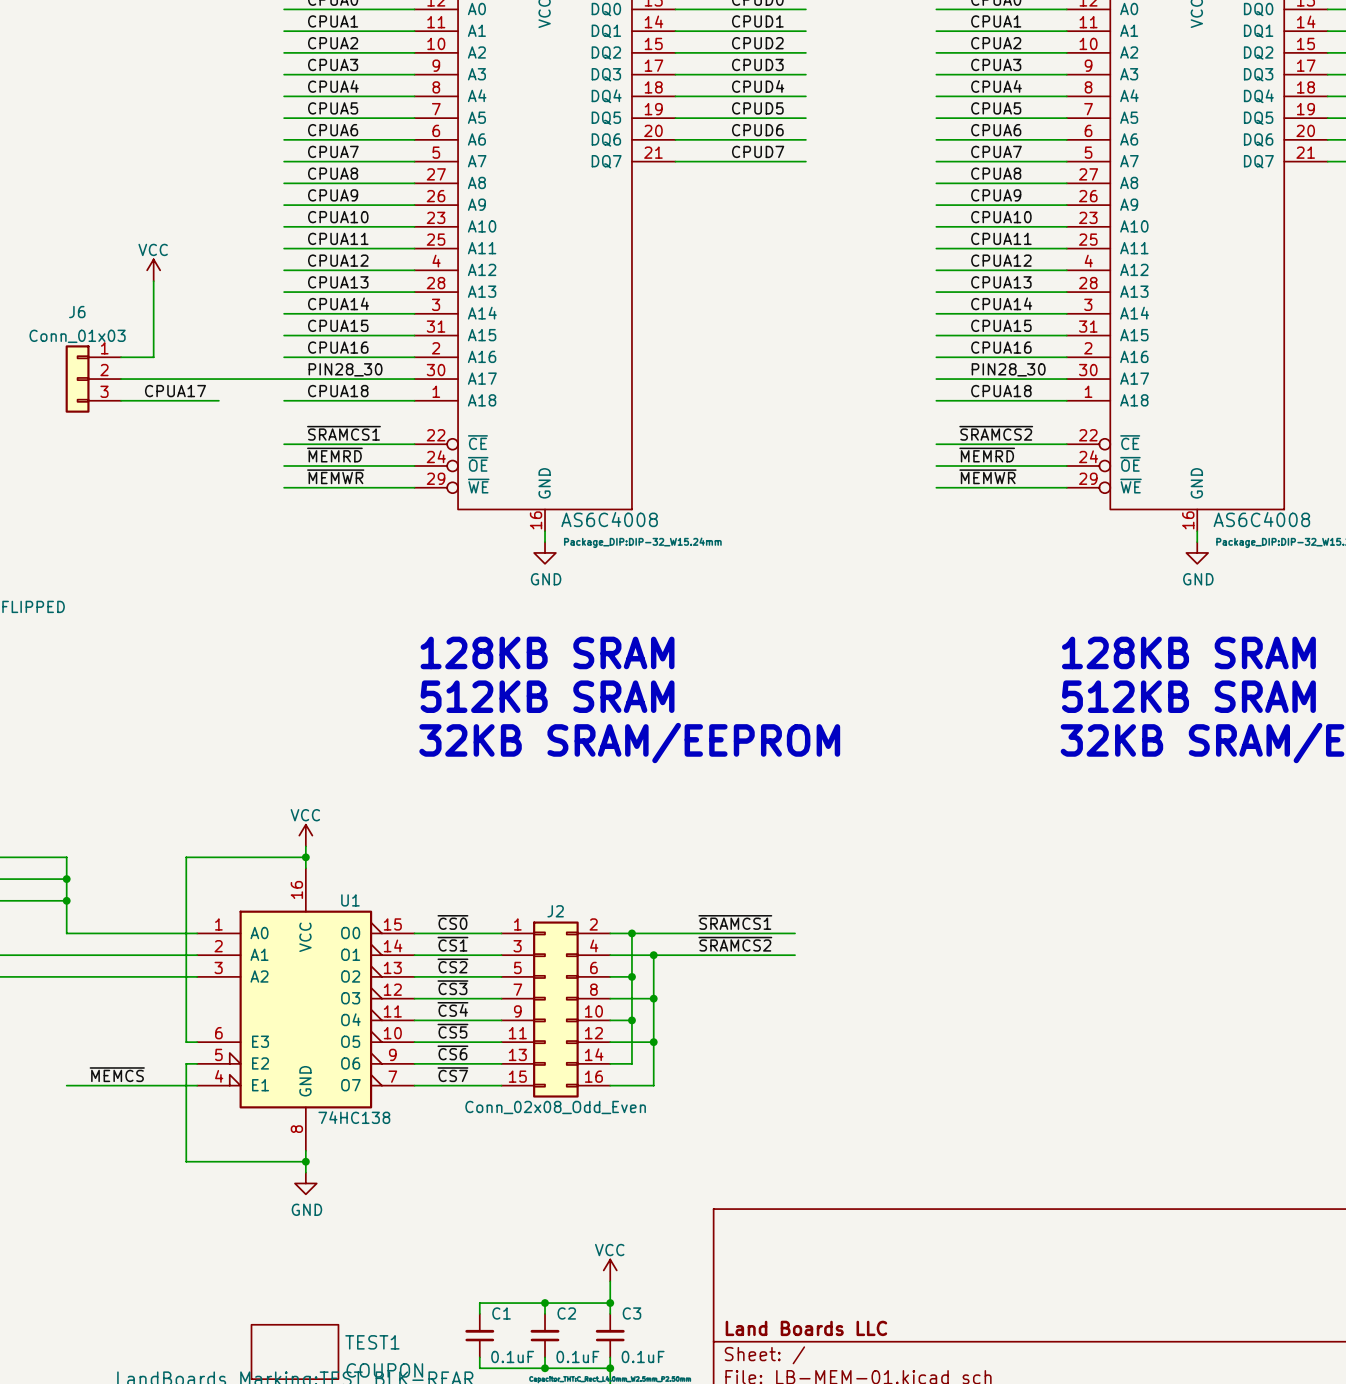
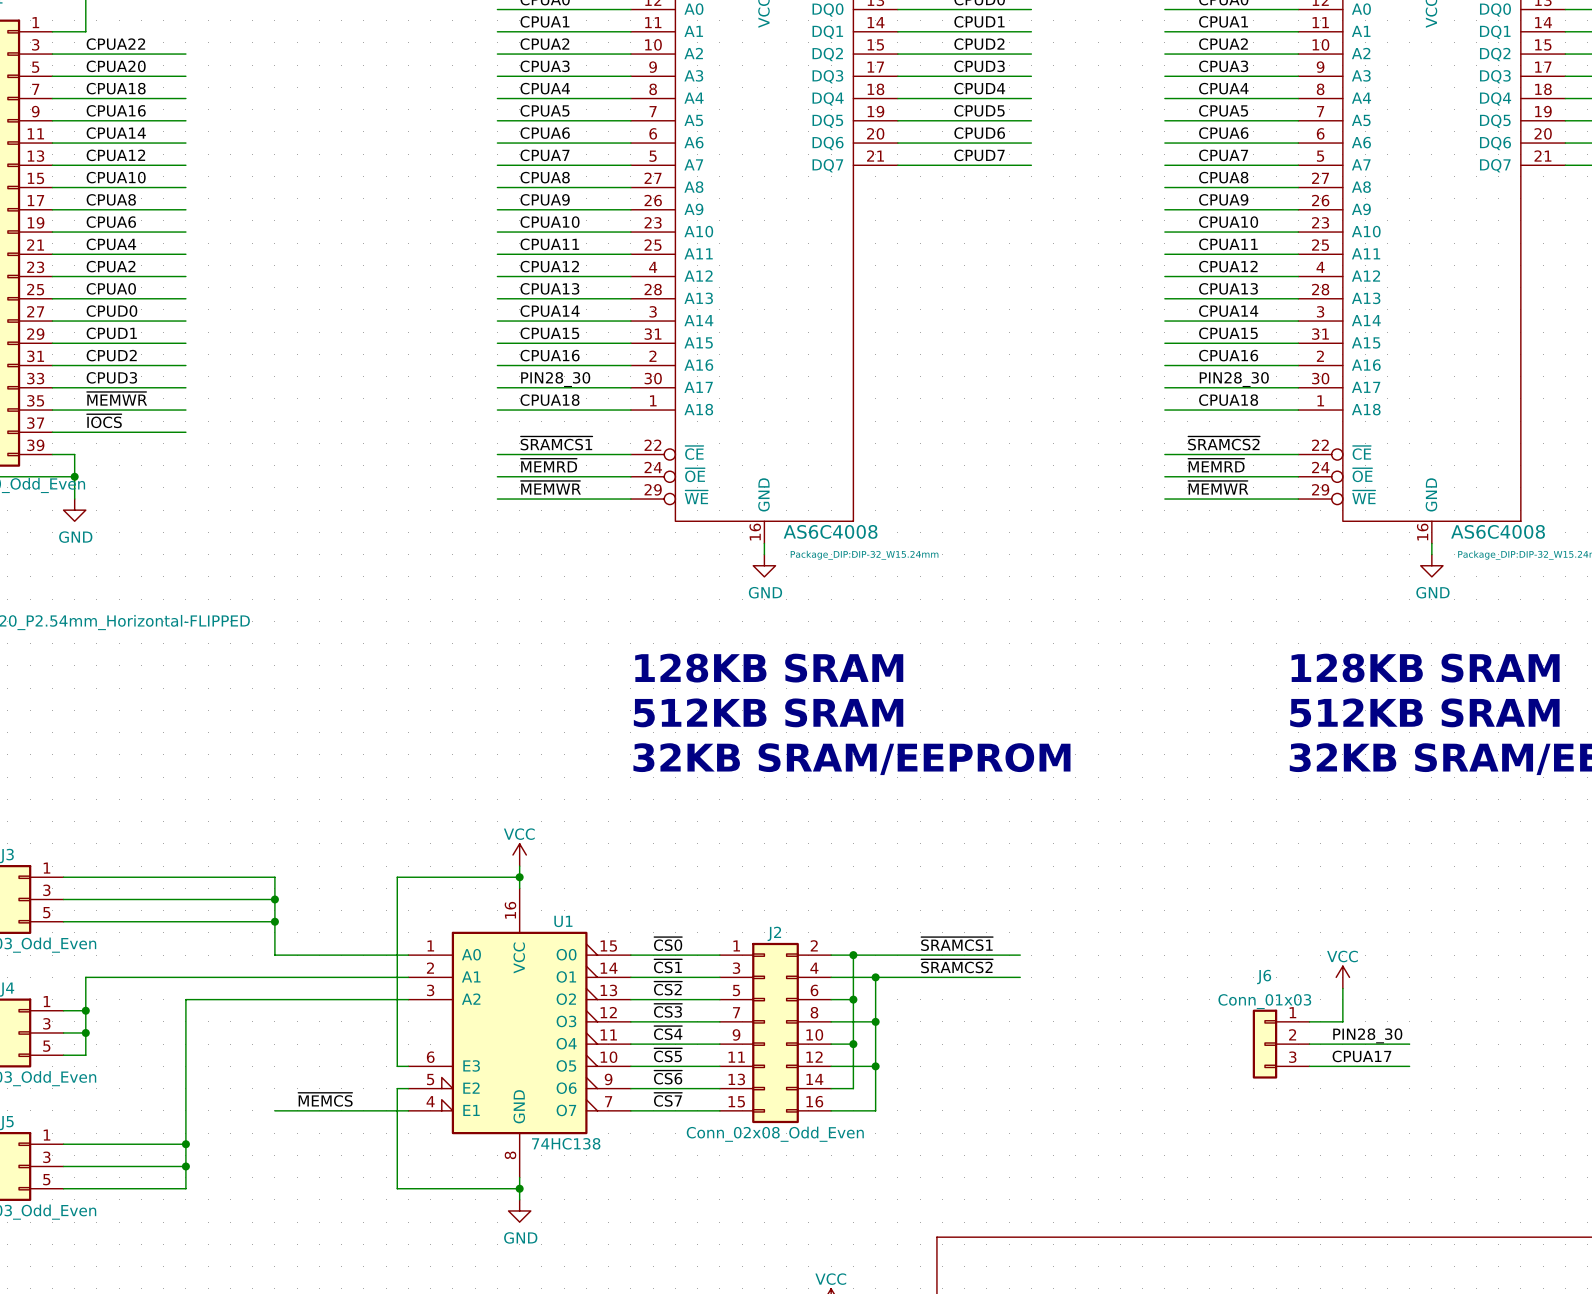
power symbol: VCC (153, 270) -> none
wire: (153, 281) (153, 357) (121, 357) -> none
J6 position: (93, 379) -> (1281, 1044)
wire: (121, 379) (284, 379) -> none
label: CPUA17 (175, 391) -> none
wire: (121, 400) (218, 400) -> none
power symbol: none -> VCC (1342, 977)
wire: none -> (1342, 988) (1342, 1021) (1309, 1021)
label: none -> PIN28_30 (1367, 1035)
wire: none -> (1309, 1044) (1409, 1044)
label: none -> CPUA17 (1361, 1056)
wire: none -> (1309, 1066) (1409, 1066)

